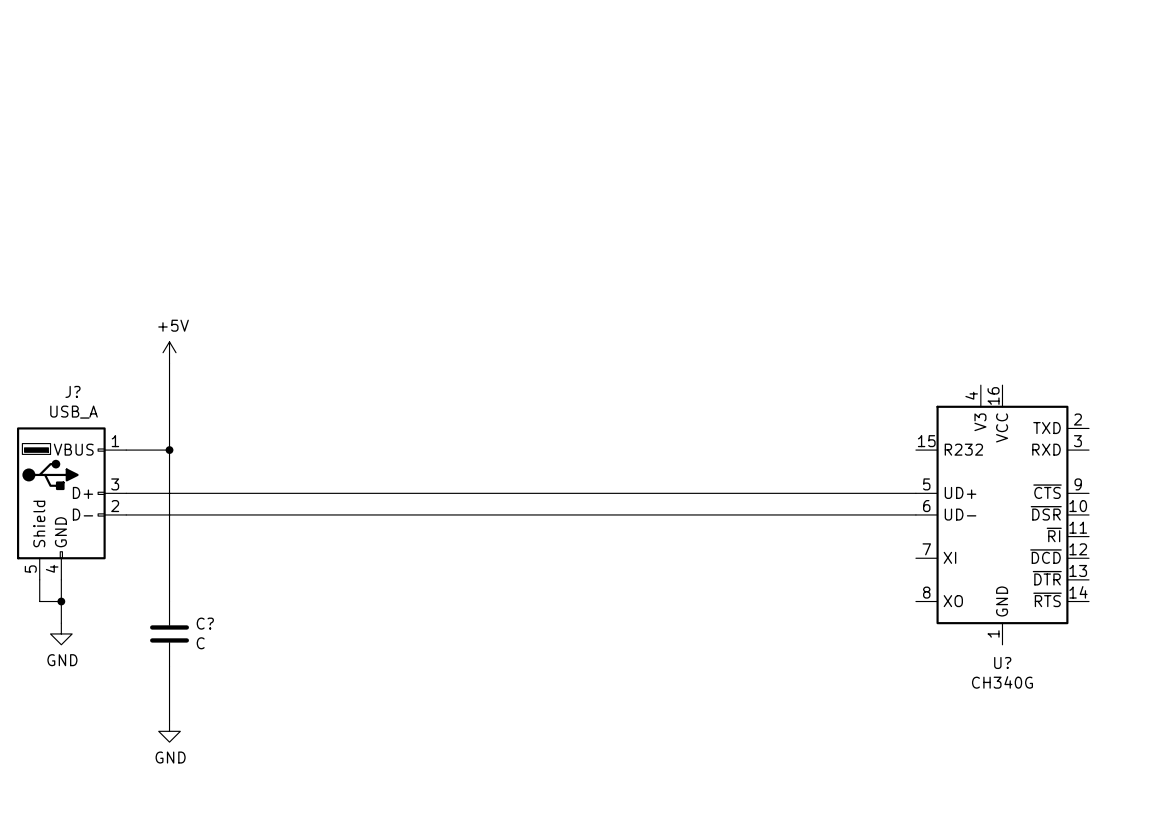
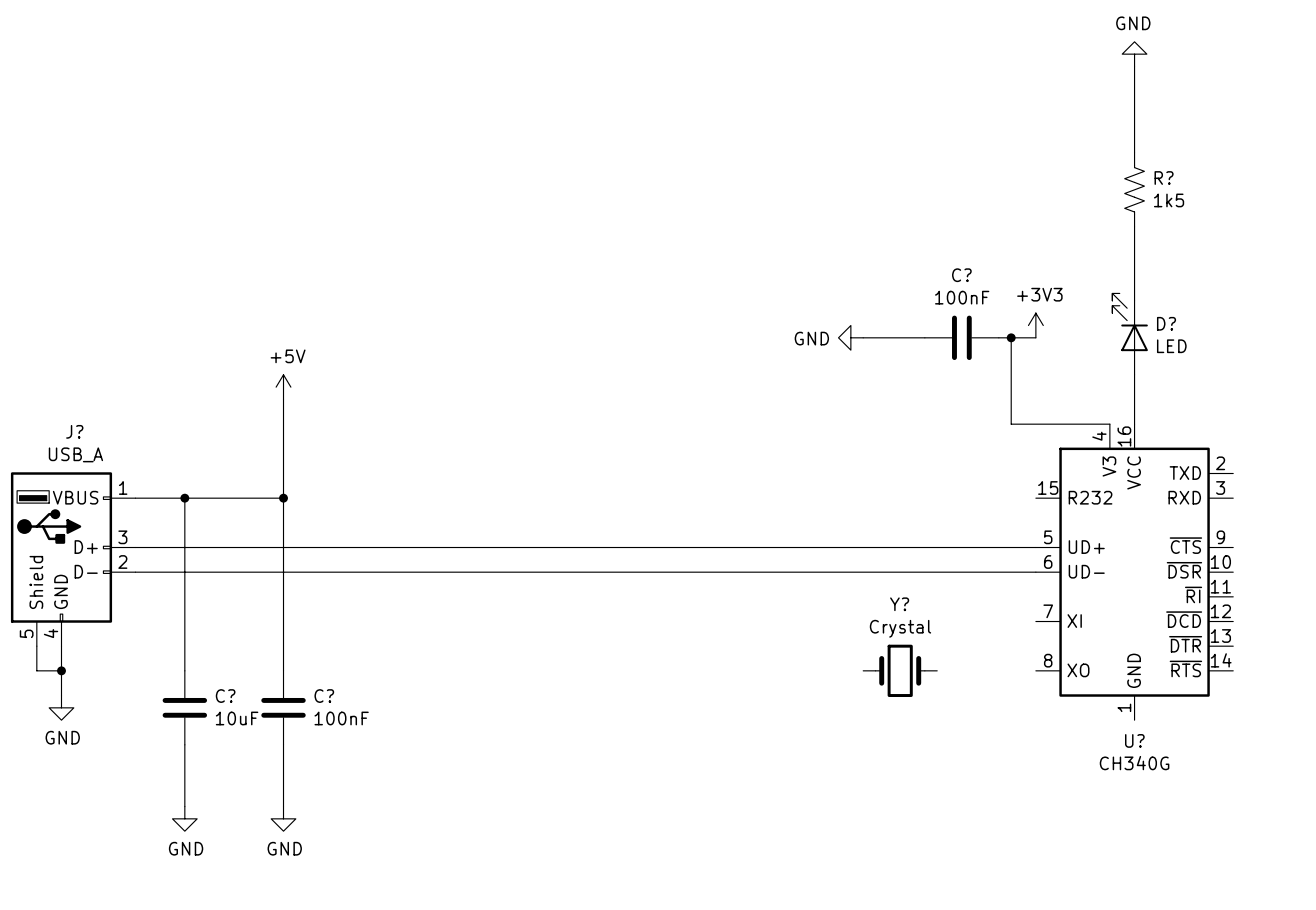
power symbol: none -> GND (1134, 54)
wire: none -> (1134, 66) (1134, 152)
R?: none -> 1k5 (1134, 189)
wire: none -> (1134, 226) (1134, 300)
power symbol: none -> +3V3 (1035, 325)
D?: none -> LED (1130, 334)
power symbol: none -> GND (850, 337)
wire: none -> (863, 337) (924, 337)
C?: none -> 100nF (961, 337)
wire: none -> (998, 337) (1035, 337)
wire: none -> (1011, 337) (1011, 424) (1109, 424)
junction: none -> (1011, 337)
wire: none -> (1134, 374) (1134, 424)
power symbol position: +5V (169, 352) -> +5V (283, 387)
wire: (169, 363) (169, 450) -> (283, 498) (184, 498)
wire: none -> (283, 399) (283, 670)
junction: none -> (283, 498)
Y?: none -> Crystal (900, 670)
C?: none -> 100nF (283, 707)
C? value: C (200, 643) -> 10uF (237, 718)
wire: none -> (283, 744) (283, 806)
power symbol: none -> GND (283, 818)

